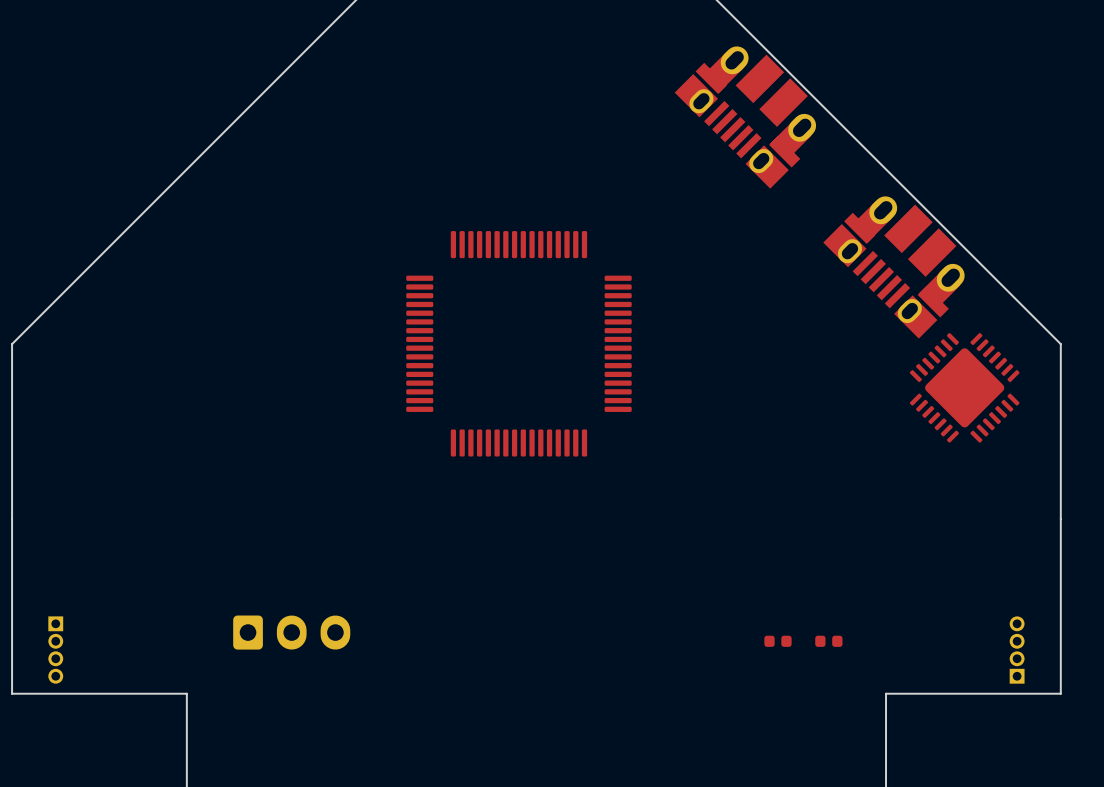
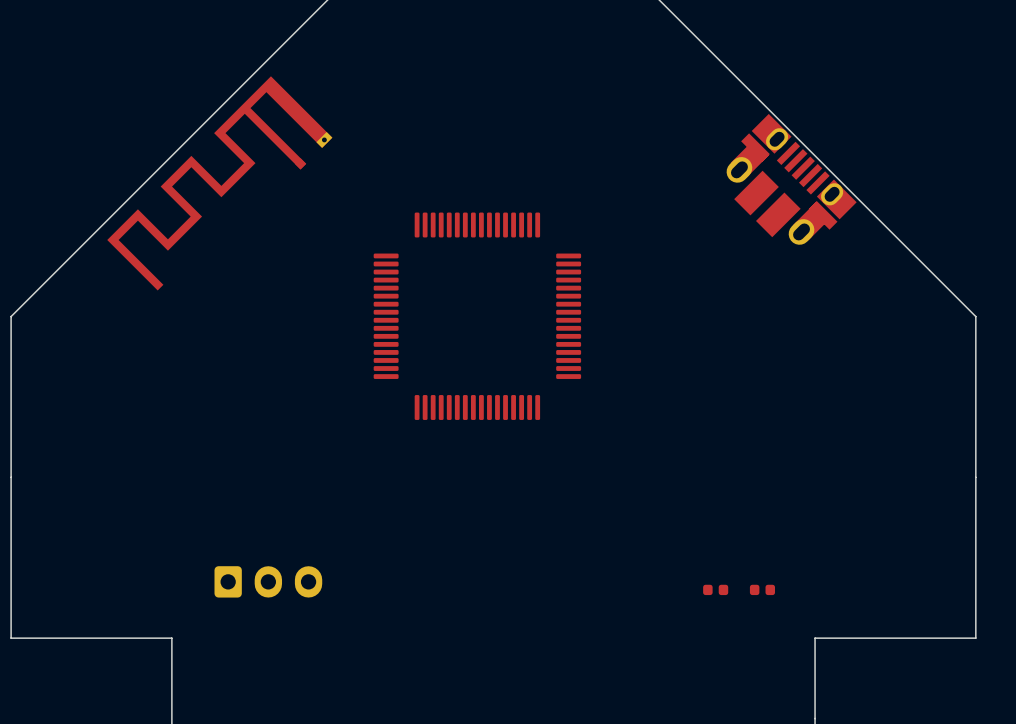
part: (745, 117) -> none
part: none -> (791, 179)
part: none -> (219, 183)
part: (893, 267) -> none
part: (964, 387) -> none
part: (55, 650) -> none
part: (1017, 650) -> none

